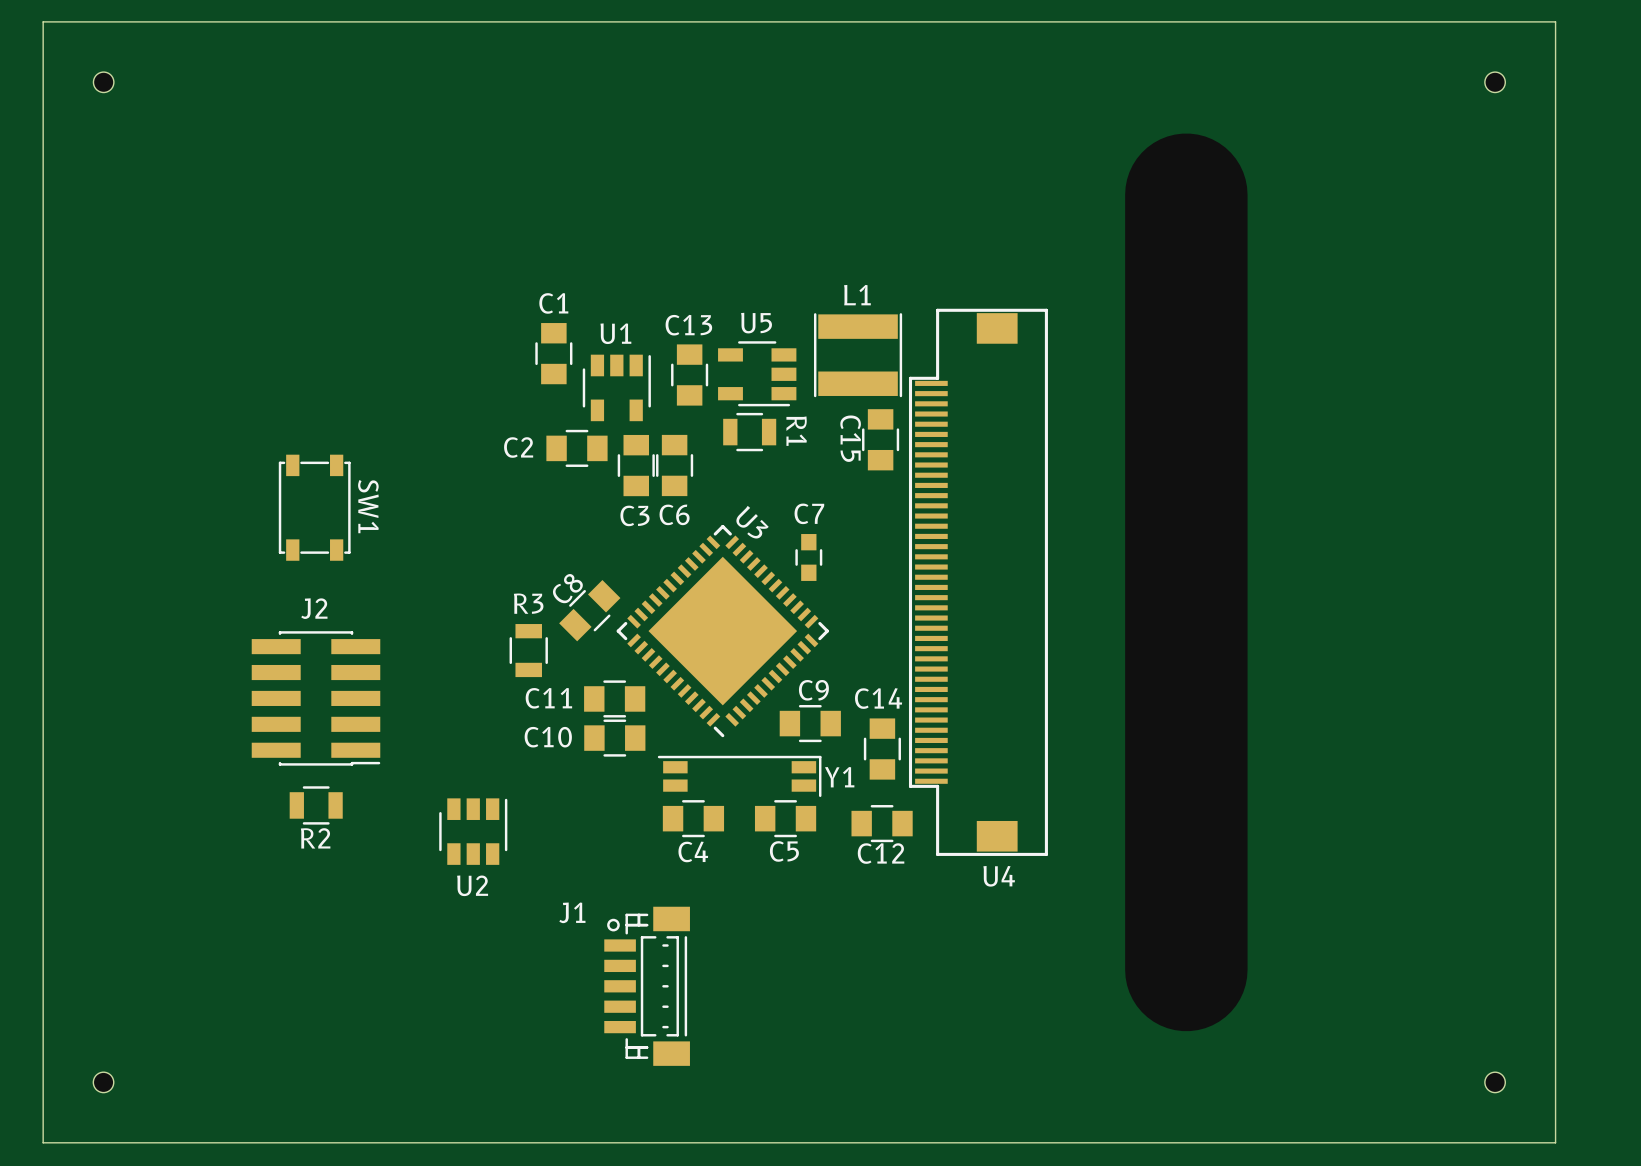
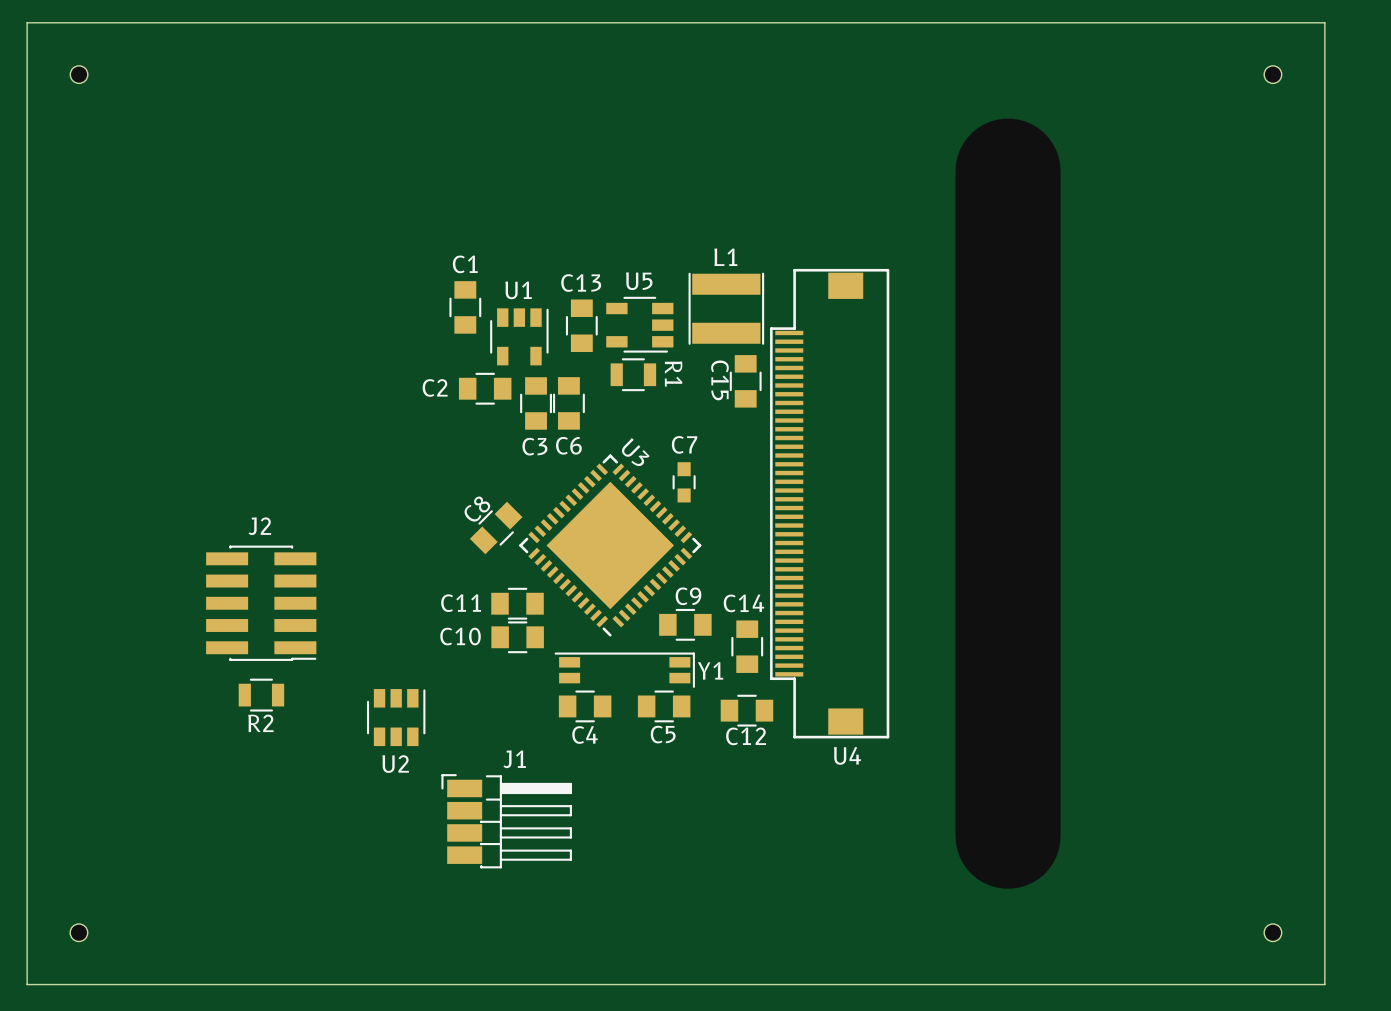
SW1: (314, 507) -> none
R3: (528, 650) -> none
J1 footprint: [604, 906, 690, 1066] -> [441, 774, 572, 869]
J1 name position: J1 (572, 912) -> J1 (514, 759)

